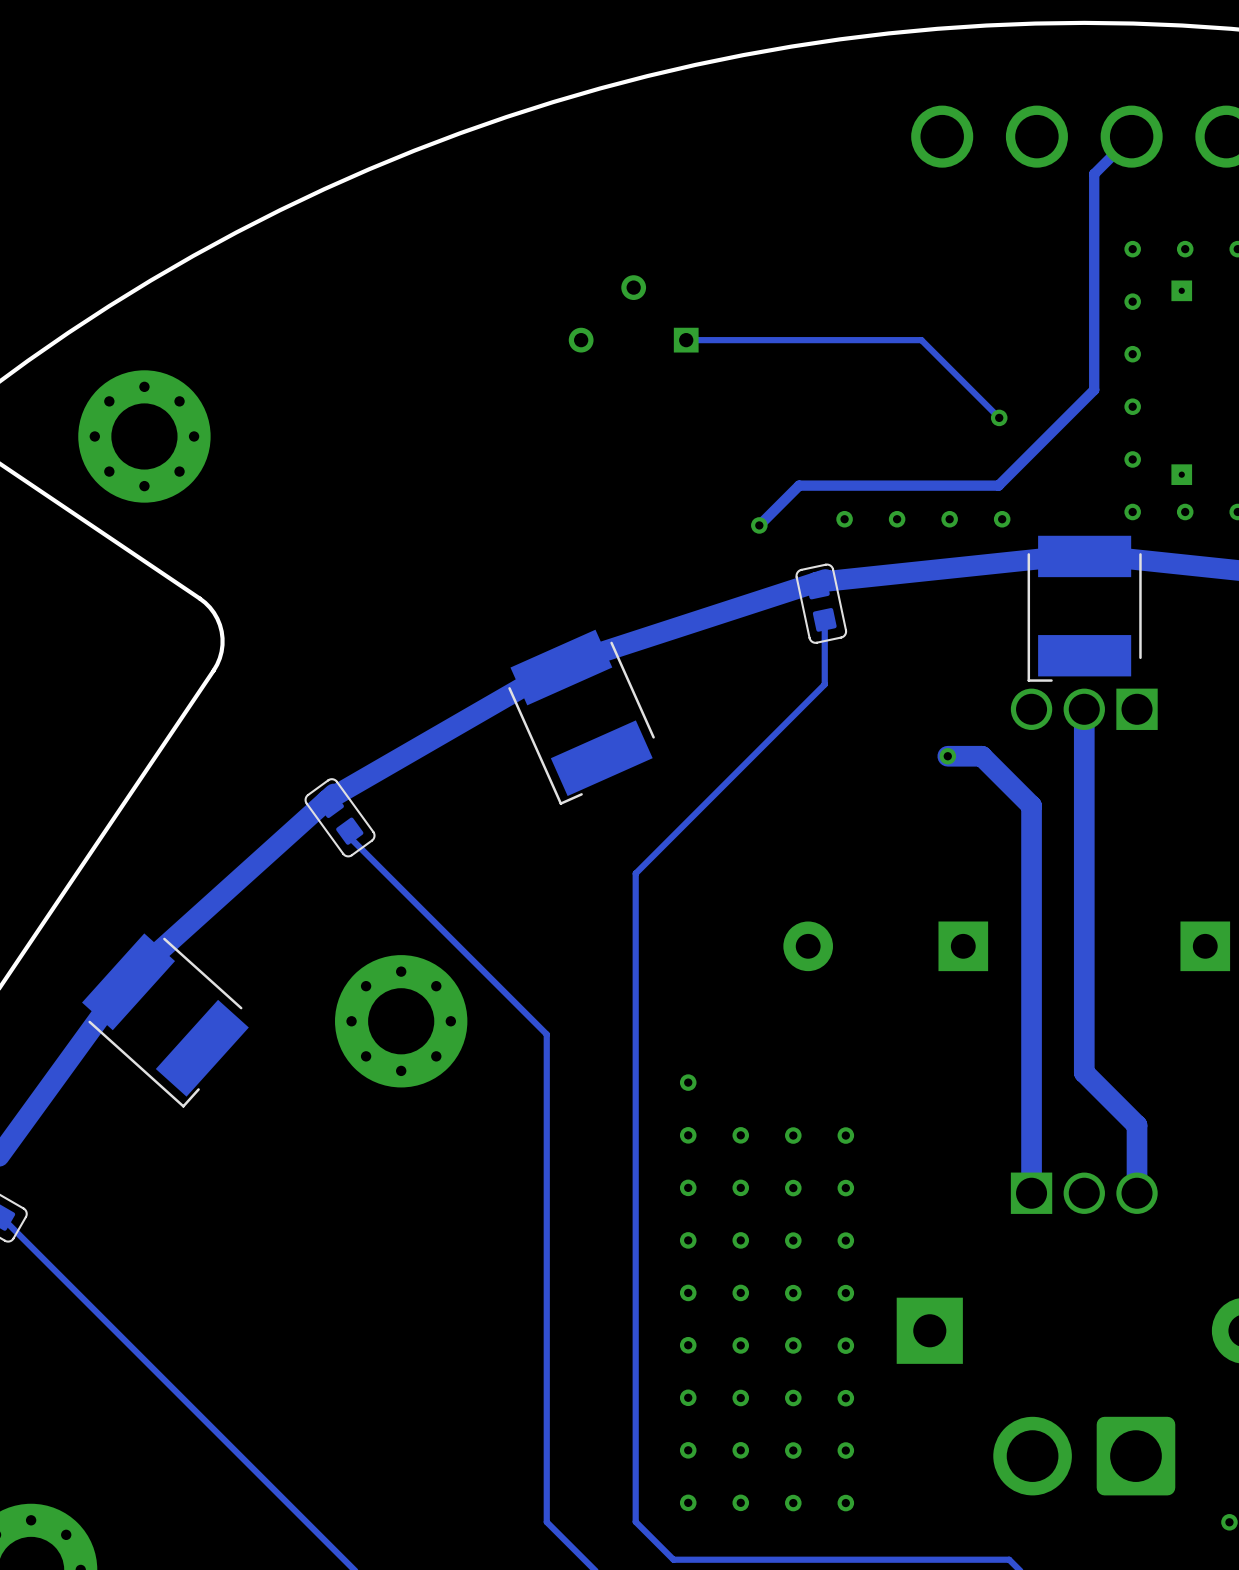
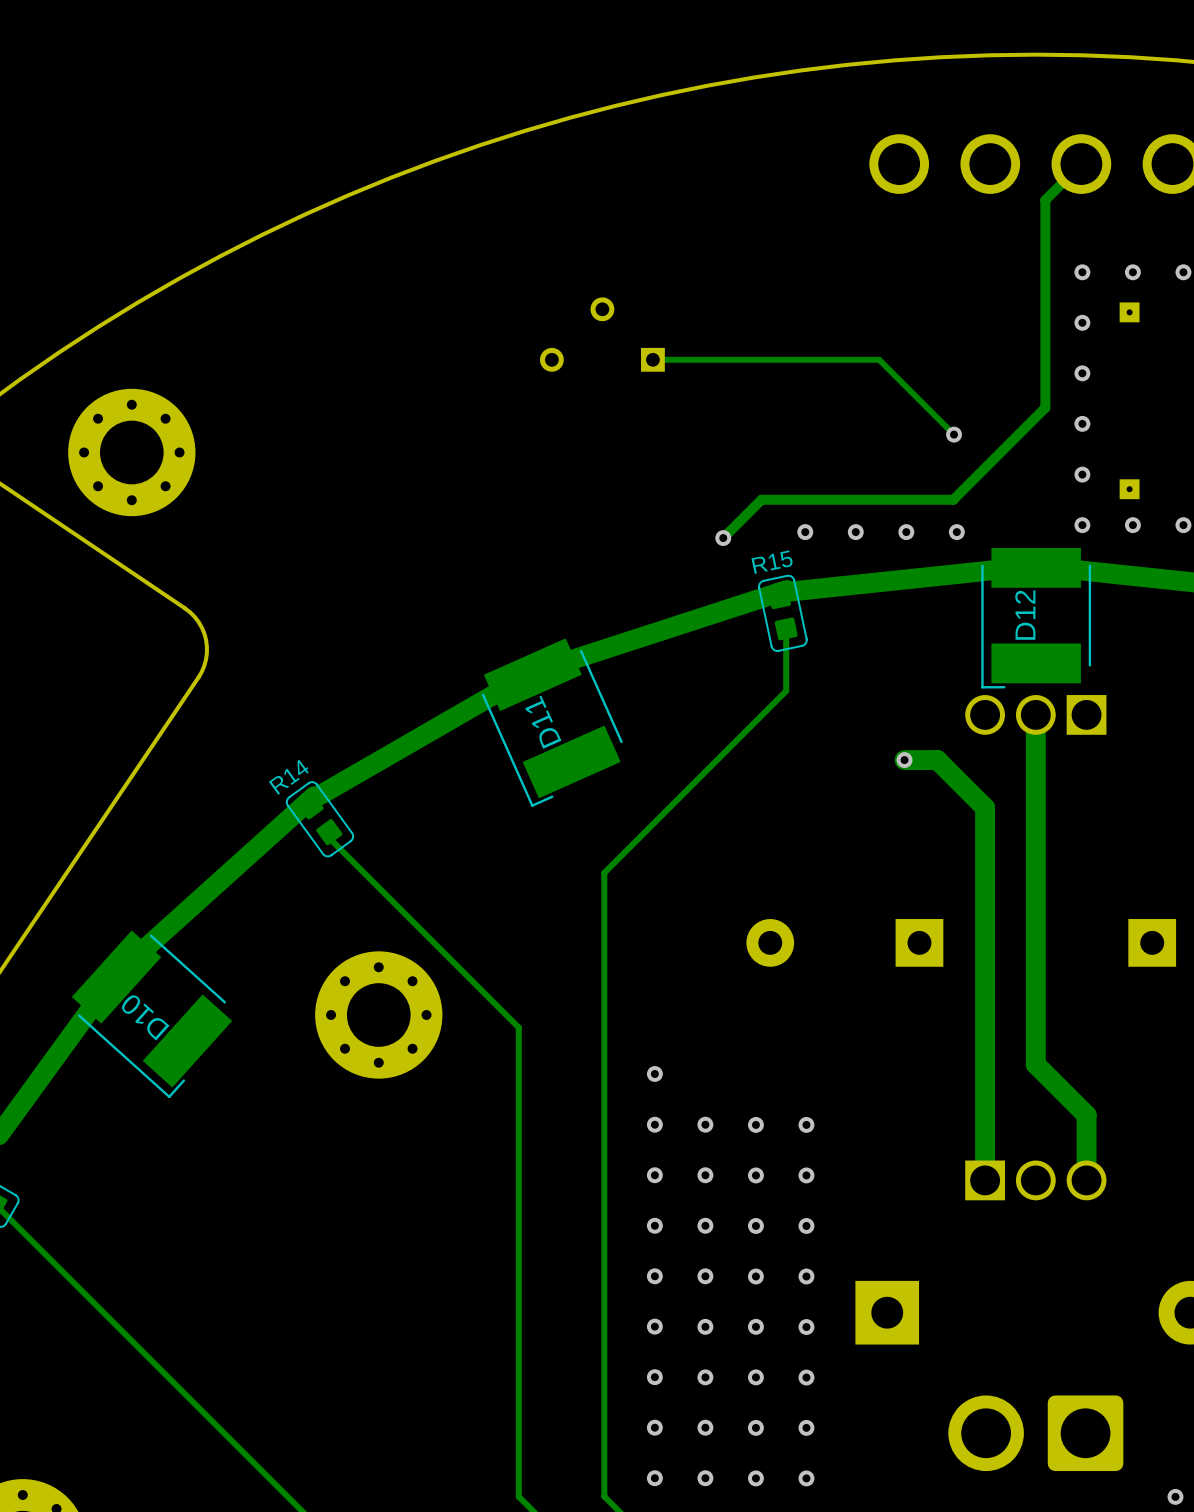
R15 name: none -> R15 (772, 562)
D12 name: none -> D12 (1025, 615)
D11 name: none -> D11 (543, 722)
R14 name: none -> R14 (288, 777)
D10 name: none -> D10 (145, 1017)

